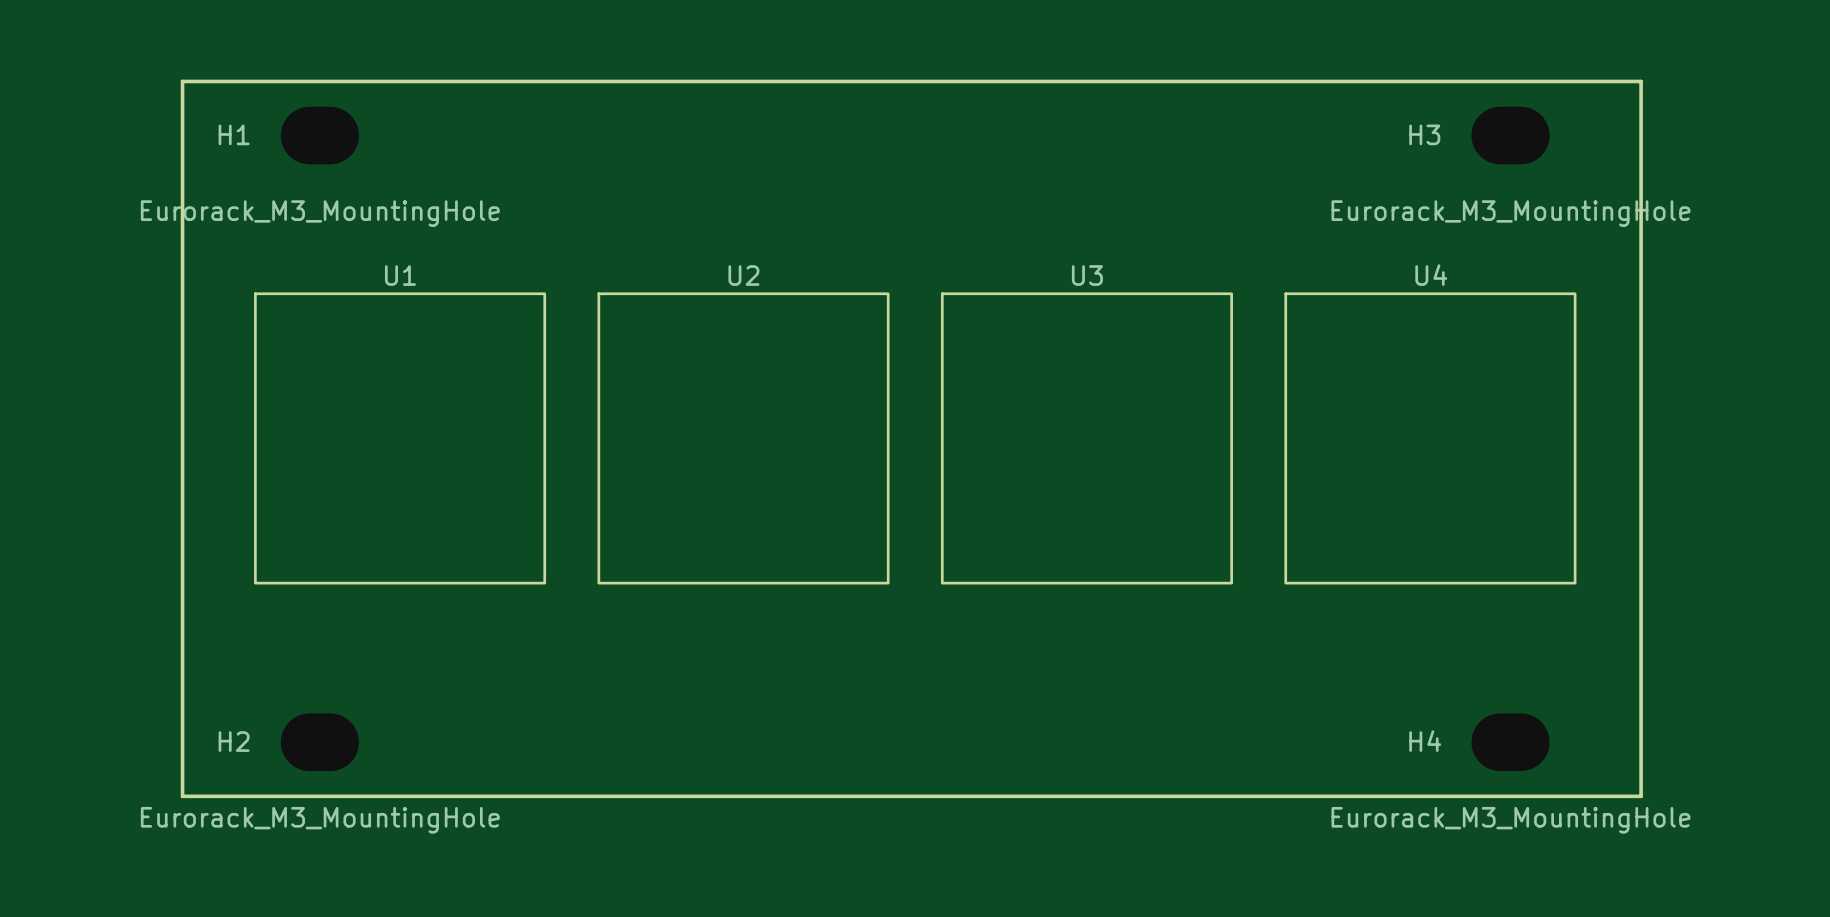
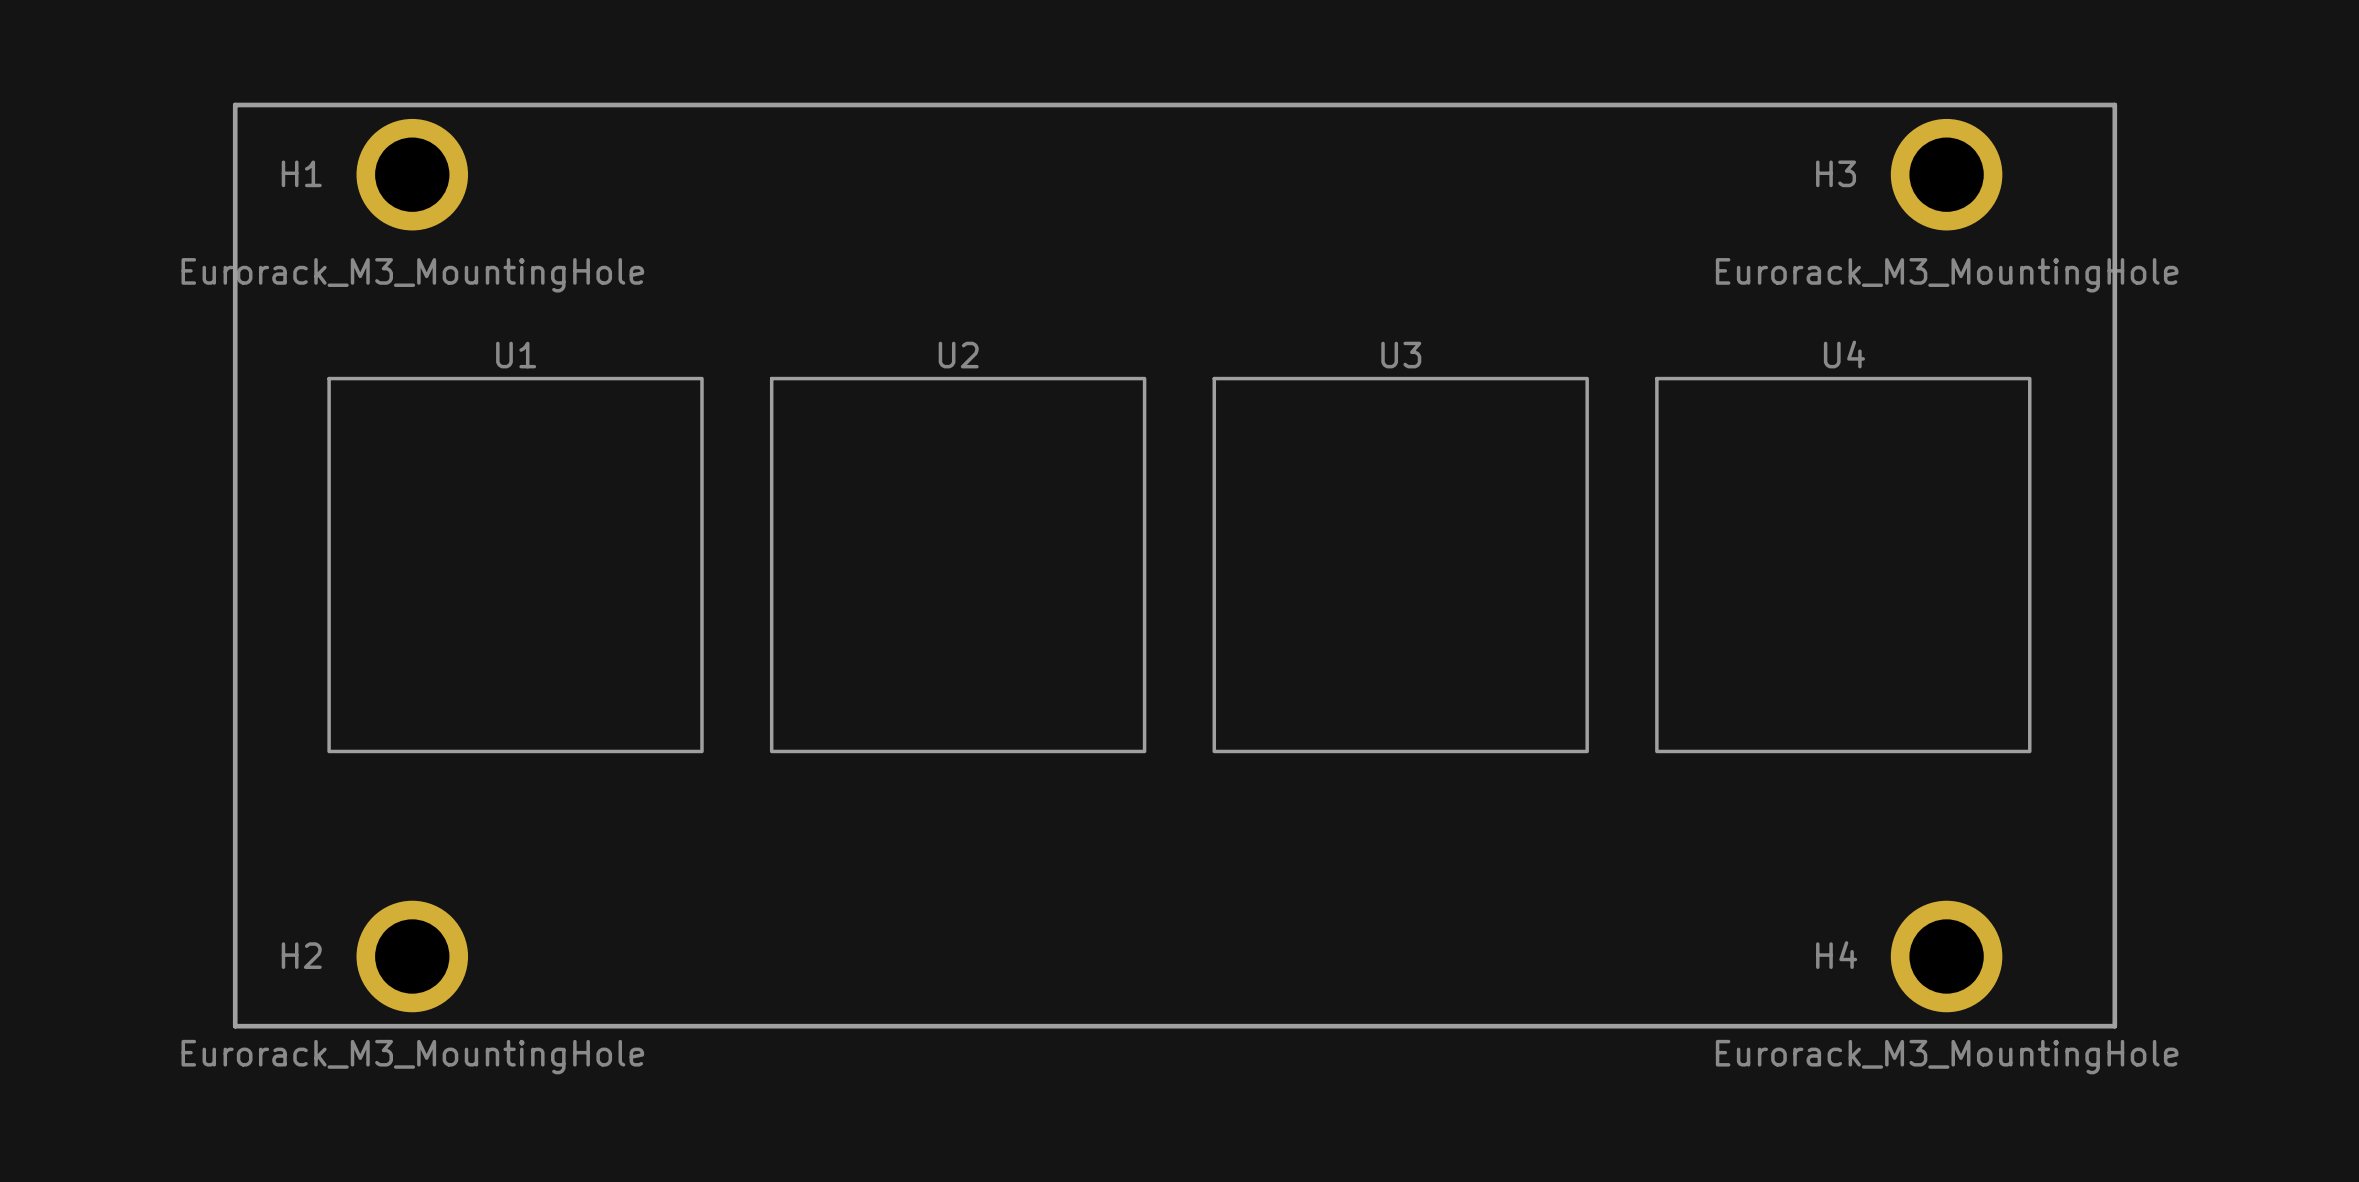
H1 footprint: [280, 106, 360, 165] -> [356, 118, 469, 231]
H3 footprint: [1471, 106, 1550, 165] -> [1890, 118, 2003, 231]
H2 footprint: [280, 713, 360, 772] -> [356, 900, 469, 1013]
H4 footprint: [1471, 713, 1550, 772] -> [1890, 900, 2003, 1013]

